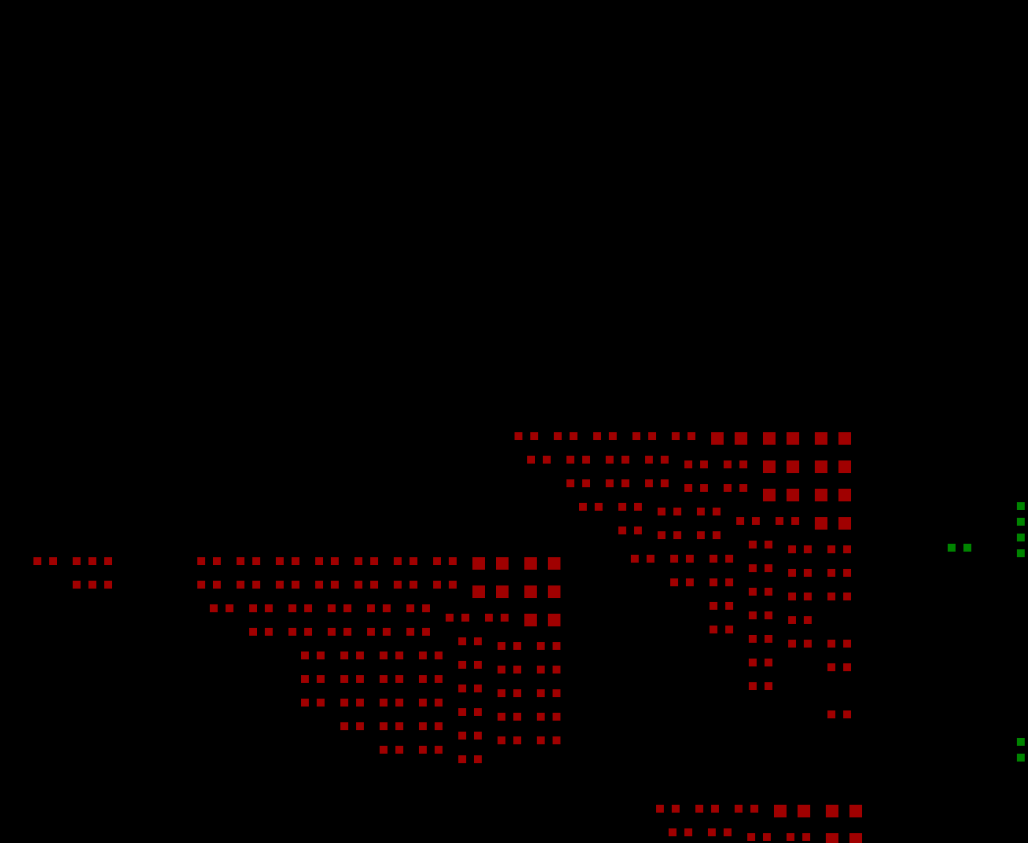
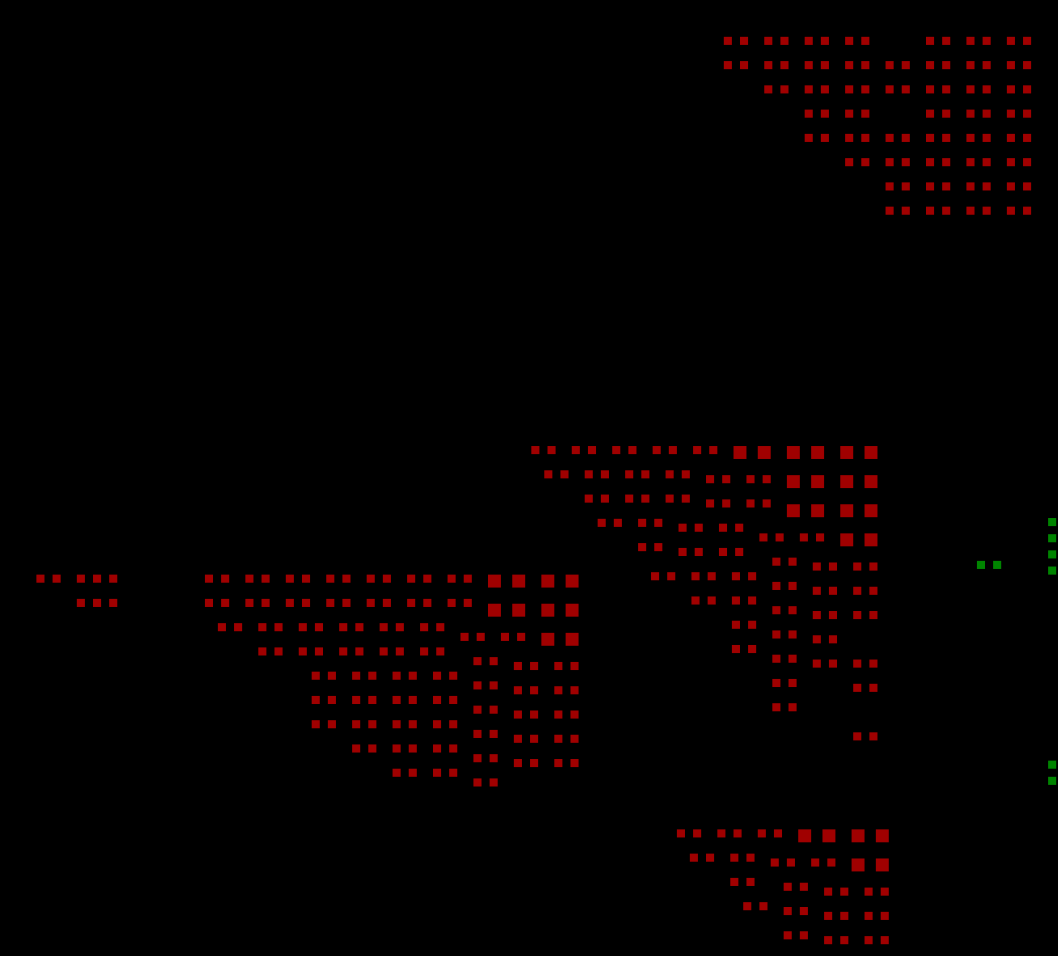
part: none -> (735, 40)
part: none -> (776, 40)
part: none -> (816, 40)
part: none -> (857, 40)
part: none -> (938, 40)
part: none -> (978, 40)
part: none -> (1018, 40)
part: none -> (735, 65)
part: none -> (776, 65)
part: none -> (816, 65)
part: none -> (857, 65)
part: none -> (897, 65)
part: none -> (938, 65)
part: none -> (978, 65)
part: none -> (1018, 65)
part: none -> (776, 89)
part: none -> (816, 89)
part: none -> (857, 89)
part: none -> (897, 89)
part: none -> (938, 89)
part: none -> (978, 89)
part: none -> (1018, 89)
part: none -> (816, 113)
part: none -> (857, 113)
part: none -> (938, 113)
part: none -> (978, 113)
part: none -> (1018, 113)
part: none -> (816, 137)
part: none -> (857, 137)
part: none -> (897, 137)
part: none -> (938, 137)
part: none -> (978, 137)
part: none -> (1018, 137)
part: none -> (857, 162)
part: none -> (897, 162)
part: none -> (938, 162)
part: none -> (978, 162)
part: none -> (1018, 162)
part: none -> (897, 186)
part: none -> (938, 186)
part: none -> (978, 186)
part: none -> (1018, 186)
part: none -> (897, 210)
part: none -> (938, 210)
part: none -> (978, 210)
part: none -> (1018, 210)

